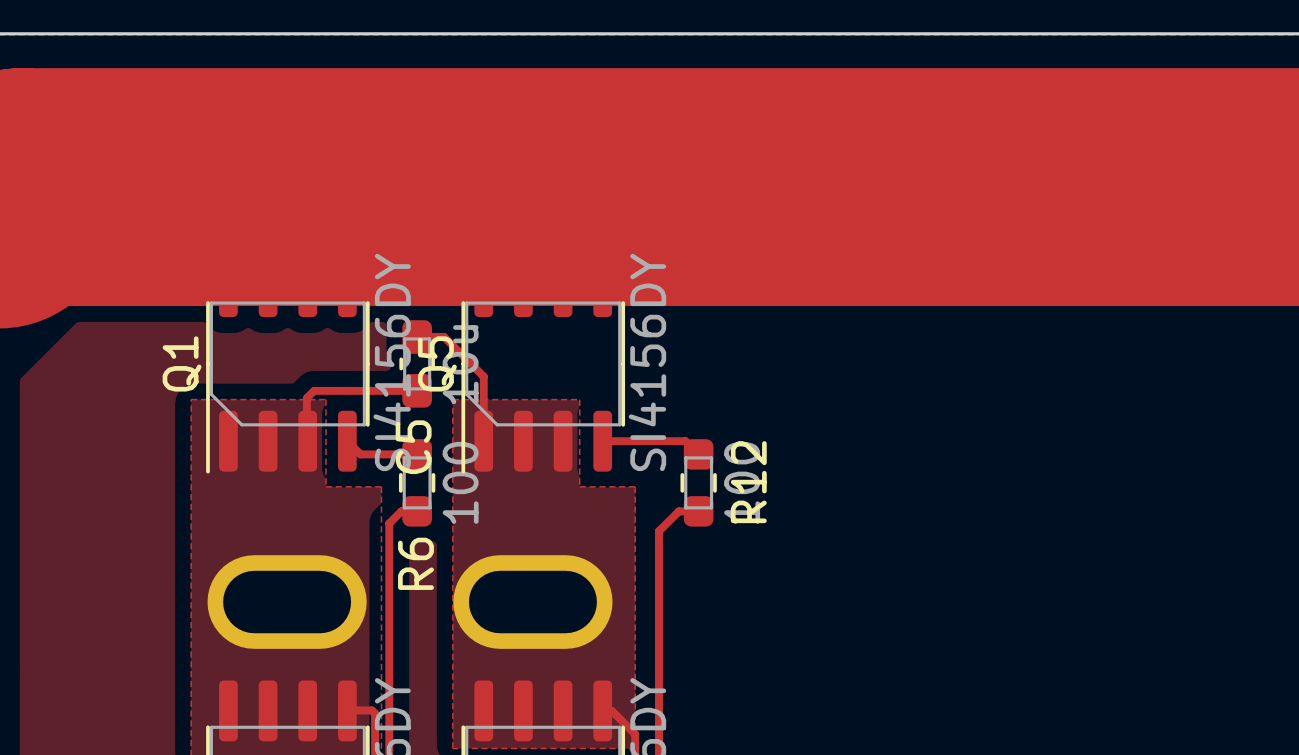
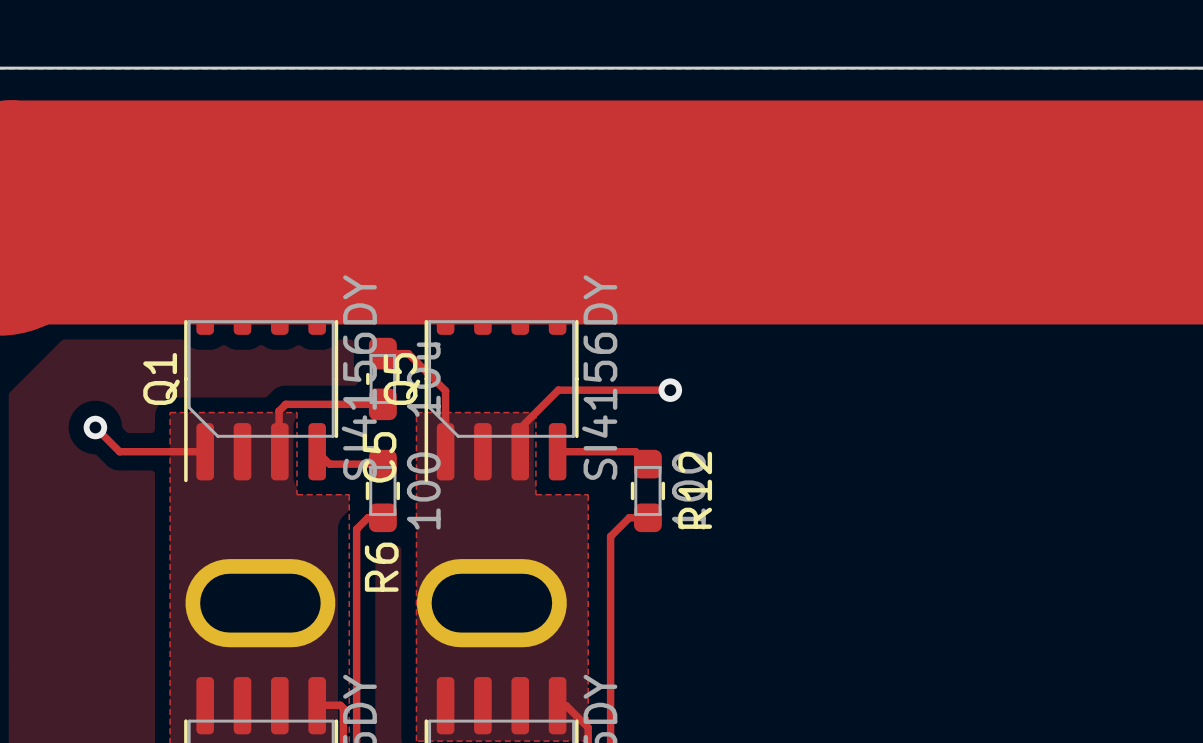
track: none -> (670, 390) (558, 390) (520, 428) (520, 451)
via: none -> (670, 390)
track: none -> (95, 427) (119, 451) (205, 451)
via: none -> (95, 427)

